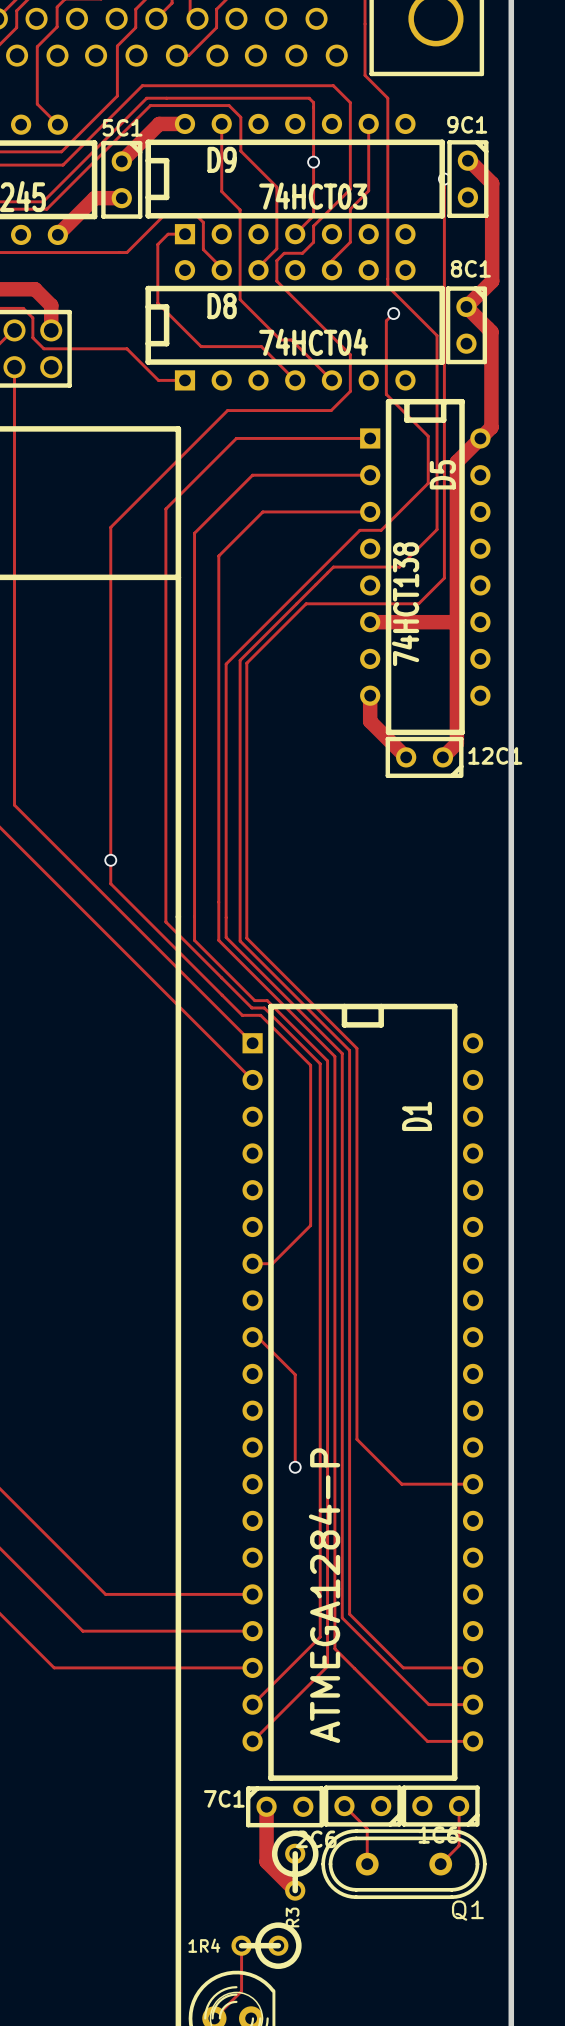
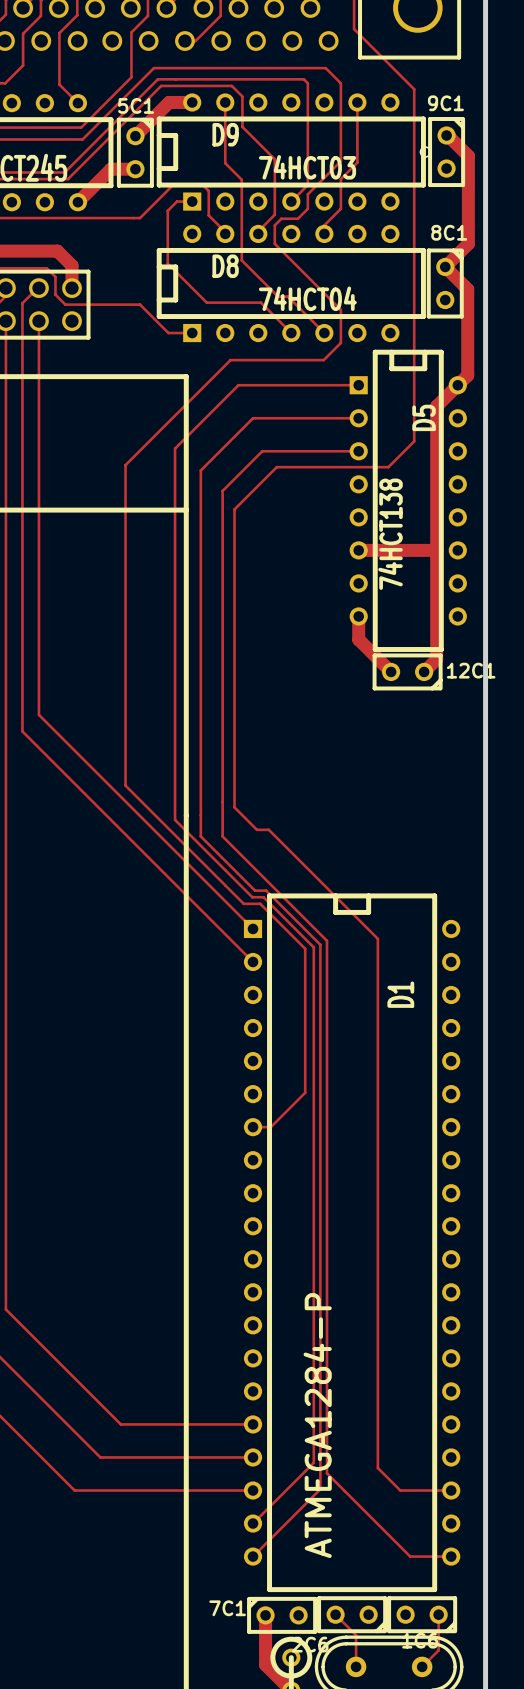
track: (365, 42) (365, 75) (387, 98) (387, 286) (437, 335) (437, 529) (399, 567) (333, 567) (240, 660) (240, 941) (349, 1050) (349, 1614) (403, 1667) (416, 1667) -> (354, 29) (414, 89) (414, 441) (388, 467) (276, 467) (234, 509) (234, 807) (256, 829) (268, 829) (377, 938) (377, 1468) (400, 1490)
via: (313, 162) -> none
track: (444, 179) (444, 578) (418, 603) (306, 603) (246, 663) (246, 938) (356, 1048) (356, 1439) (401, 1484) (473, 1484) -> none
track: (393, 313) (386, 320) (386, 394) (428, 436) (428, 483) (381, 530) (359, 530) (226, 664) (226, 937) (342, 1053) (342, 1617) (428, 1704) (473, 1704) -> none
via: (393, 313) -> none
via: (110, 860) -> none
track: (252, 1337) (257, 1337) (295, 1374) (295, 1467) -> none
via: (295, 1467) -> none

